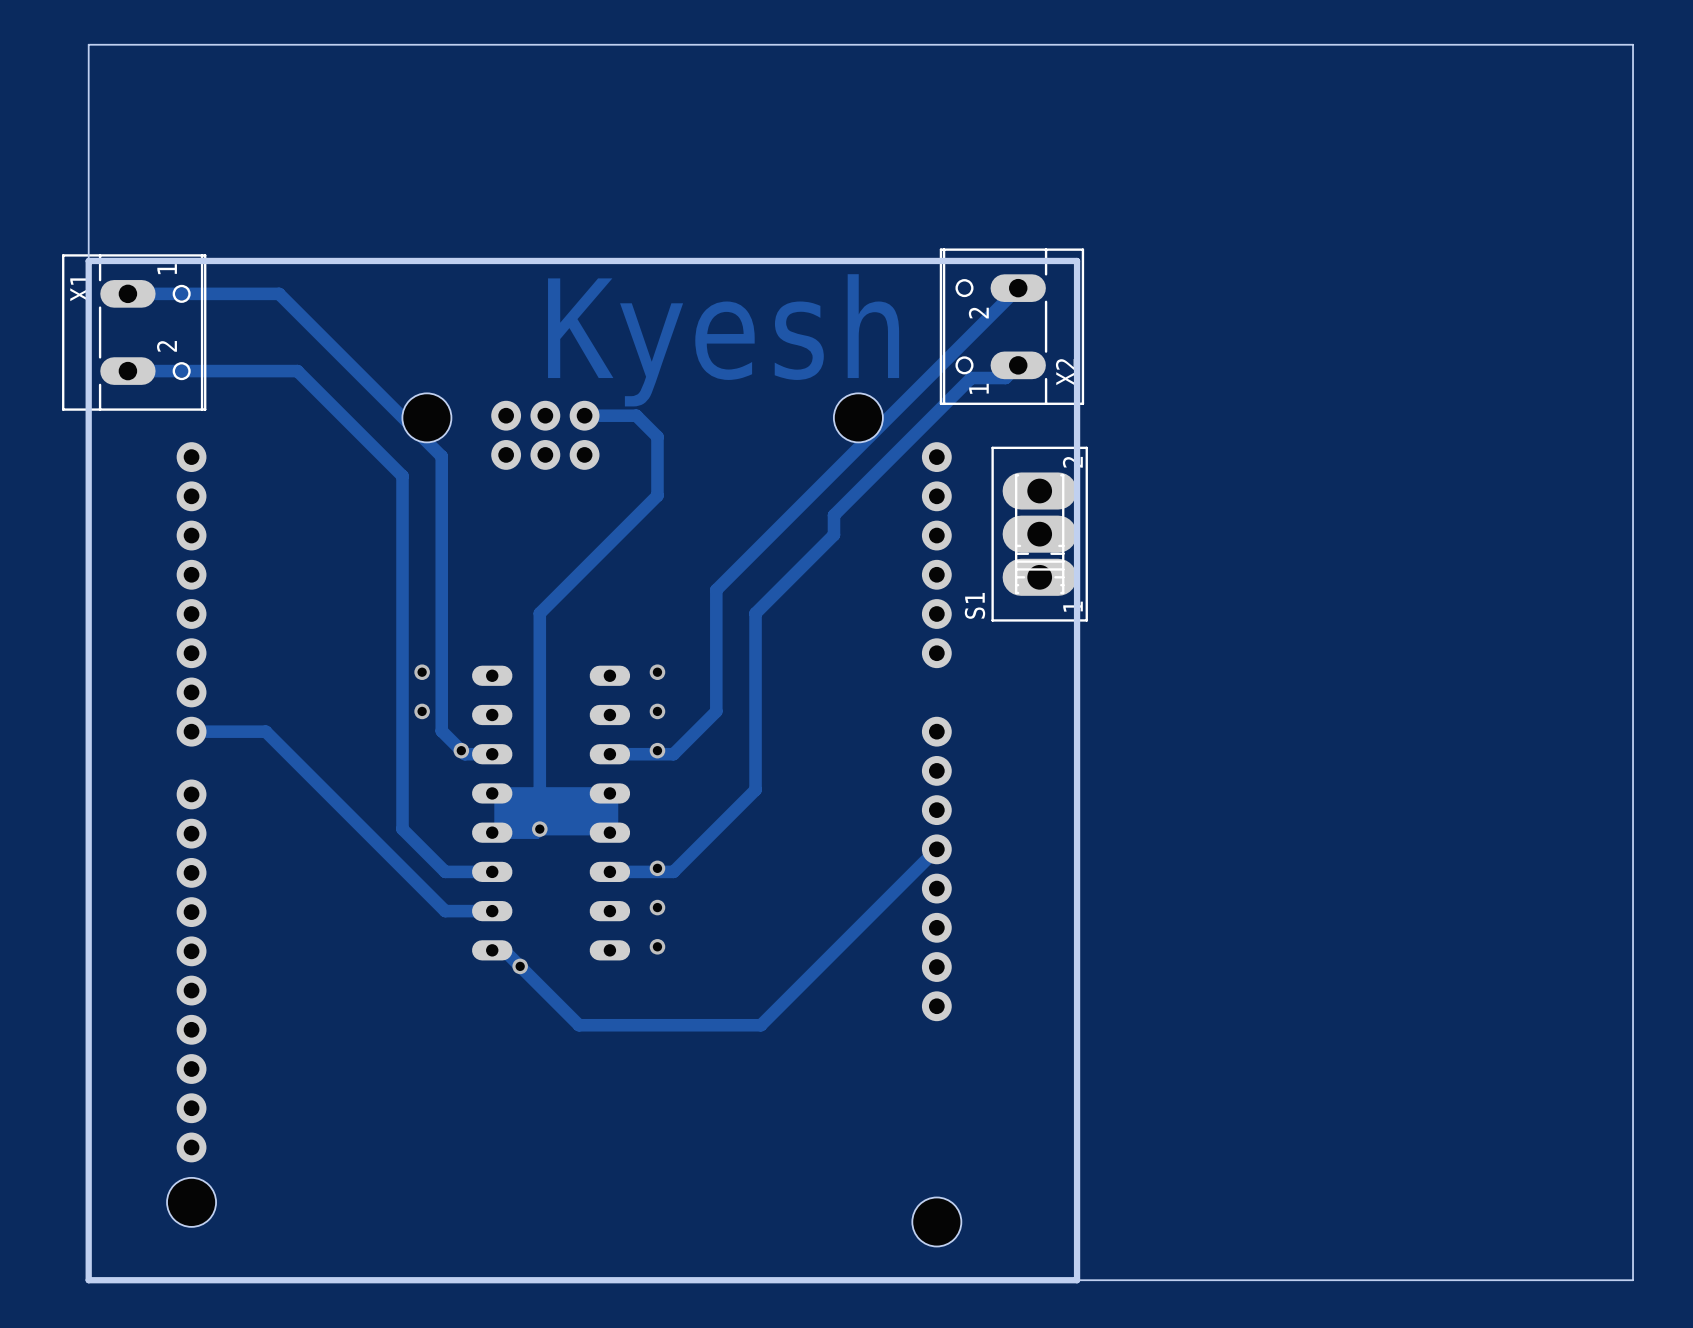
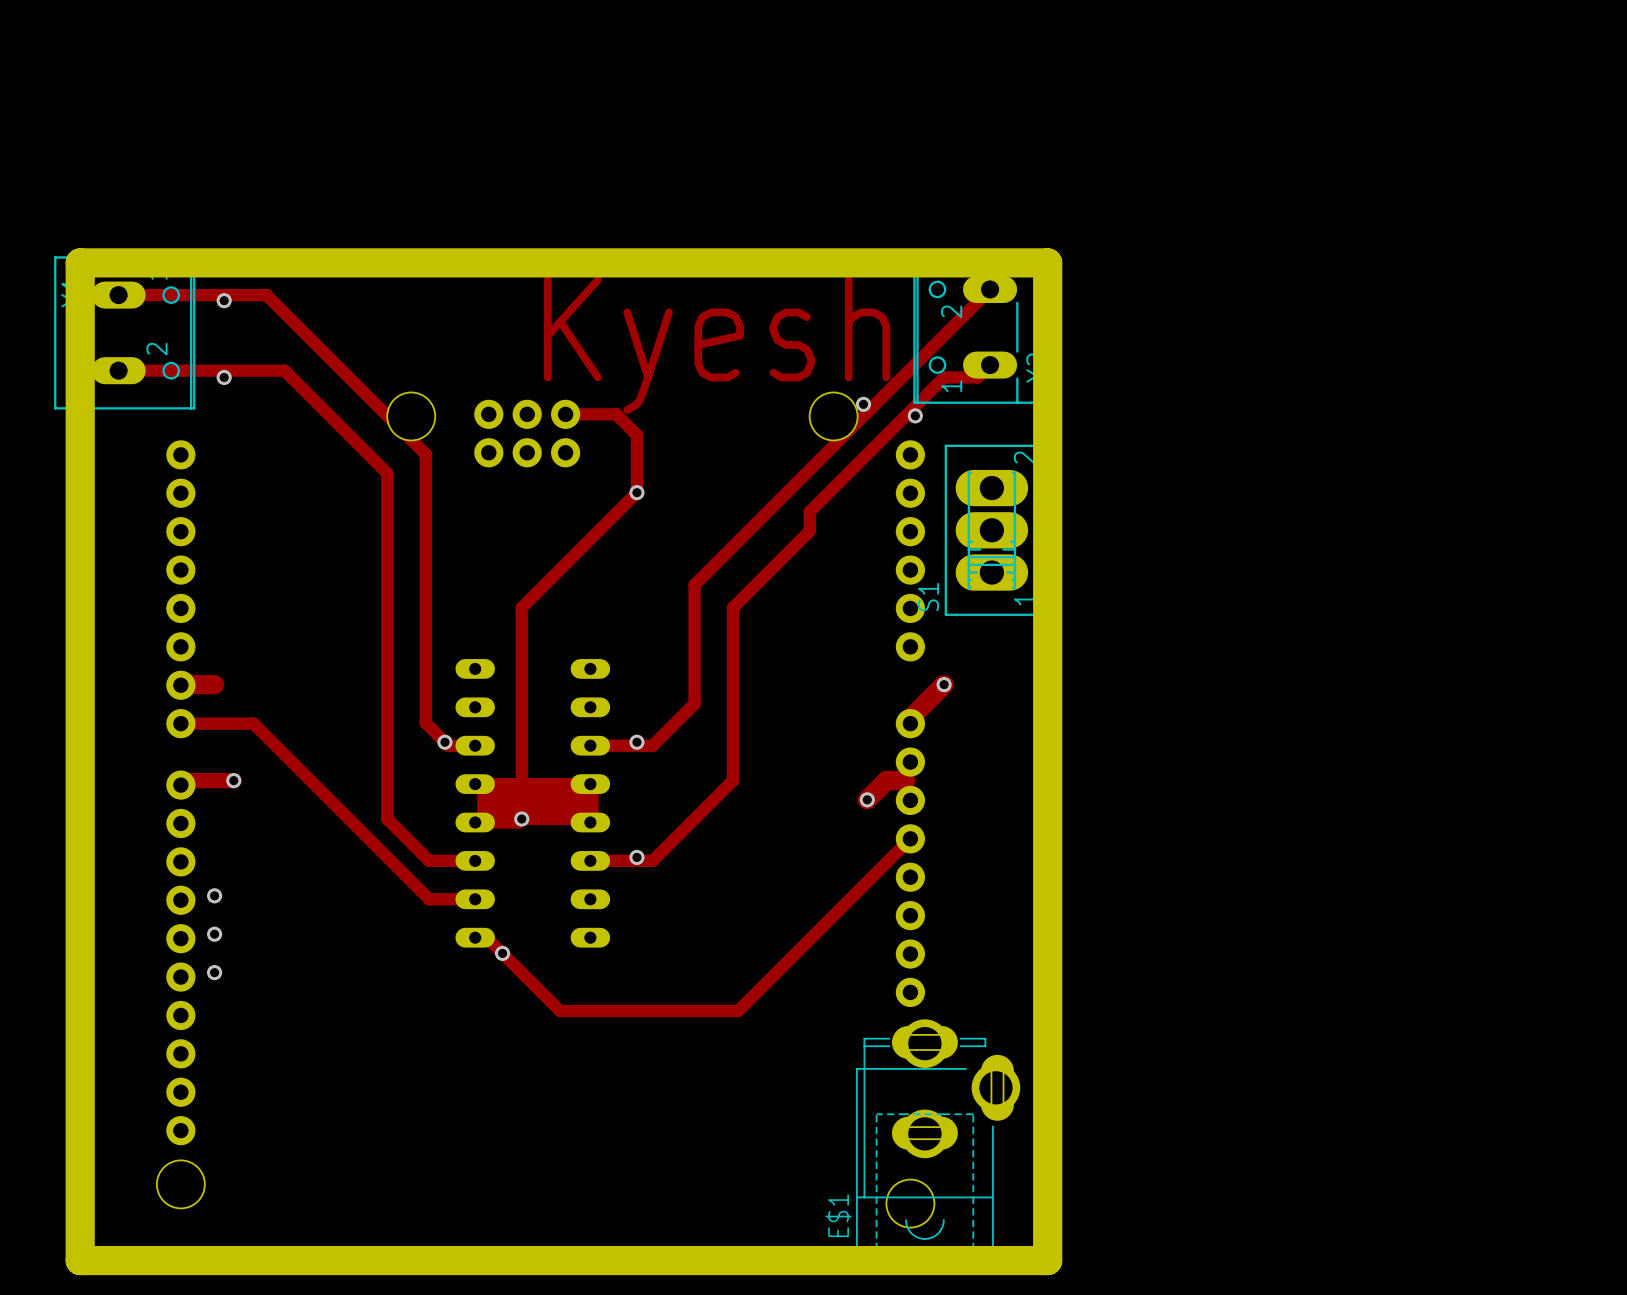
board edge: (88, 260) (88, 44) (1633, 44) (1633, 1280) (1077, 1280) -> none
board edge width: thin (88, 260) (88, 1280) (1077, 1280) (1077, 260) (88, 260) -> thick (80, 262) (80, 1260) (1047, 1260) (1047, 262) (80, 262)
via: none -> (224, 300)
via: none -> (224, 377)
via: none -> (863, 404)
via: none -> (915, 415)
via: none -> (636, 492)
S1 position: (1039, 534) -> (991, 530)
via: (422, 672) -> none
via: (657, 672) -> none
track: none -> (176, 684) (214, 684)
track: none -> (944, 684) (905, 723)
via: none -> (944, 684)
via: (422, 711) -> none
via: (657, 711) -> none
track: none -> (176, 780) (233, 780)
via: none -> (233, 780)
track: none -> (905, 780) (886, 780) (867, 799)
via: none -> (867, 799)
via: none -> (214, 895)
via: (657, 907) -> none
via: none -> (214, 934)
via: (657, 946) -> none
via: none -> (214, 972)
E$1: none -> (938, 1135)

